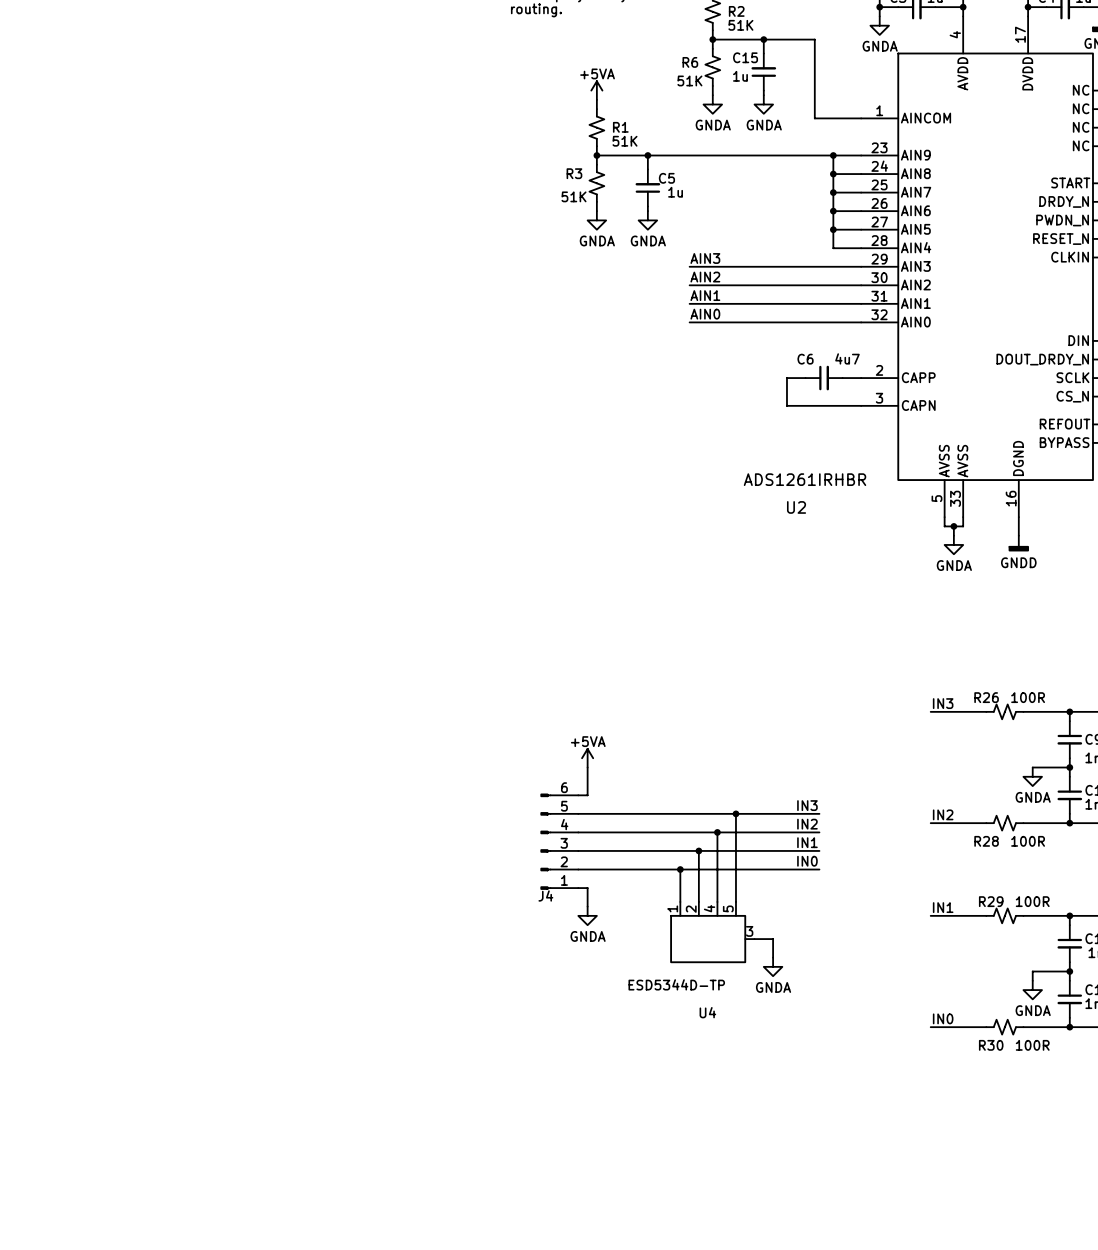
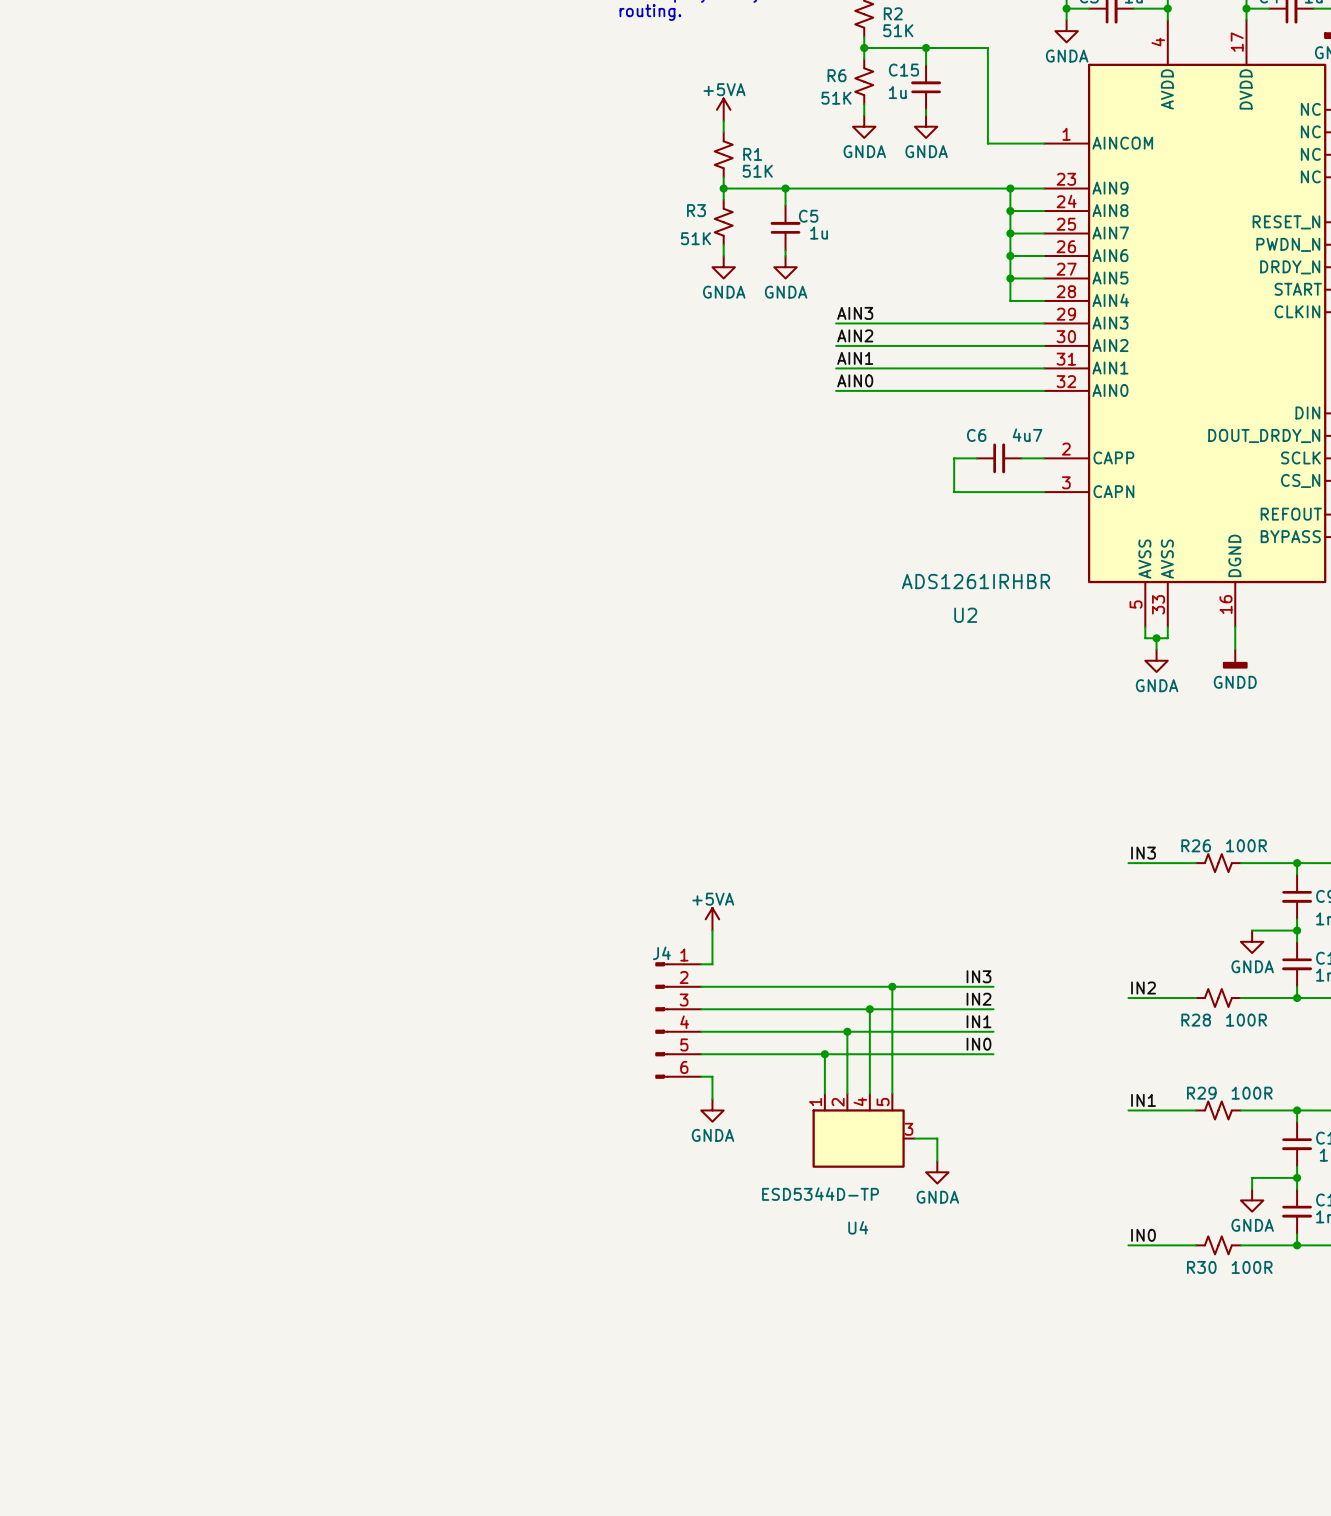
U2 pin name: START (1070, 182) -> RESET_N (1286, 222)
U2 pin name: DRDY_N (1064, 201) -> PWDN_N (1288, 244)
U2 pin name: PWDN_N (1062, 220) -> DRDY_N (1290, 267)
U2 pin name: RESET_N (1061, 239) -> START (1298, 289)
J4 flip: as is (545, 841) -> up-down (661, 1020)

